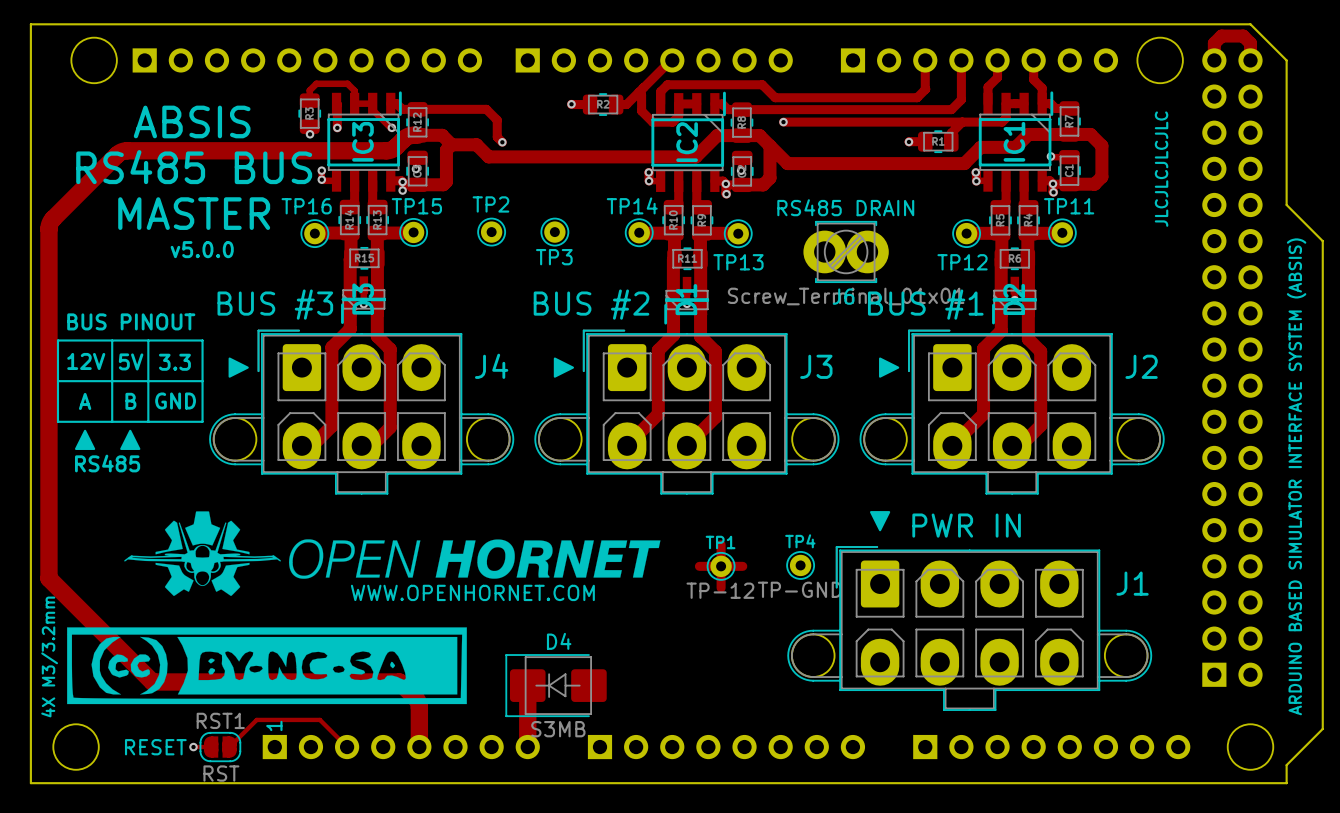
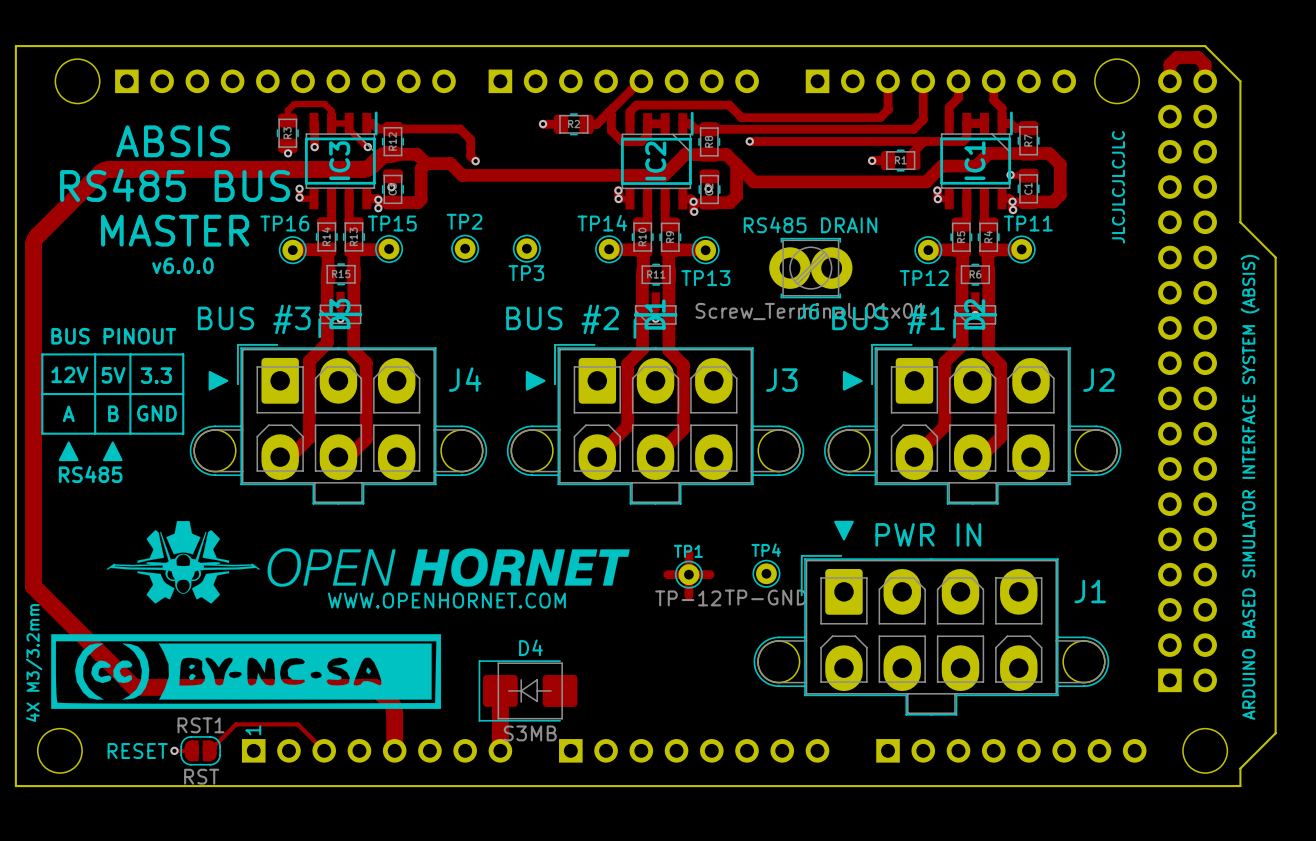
text: v5.0.0 (202, 249) -> v6.0.0 (182, 265)

